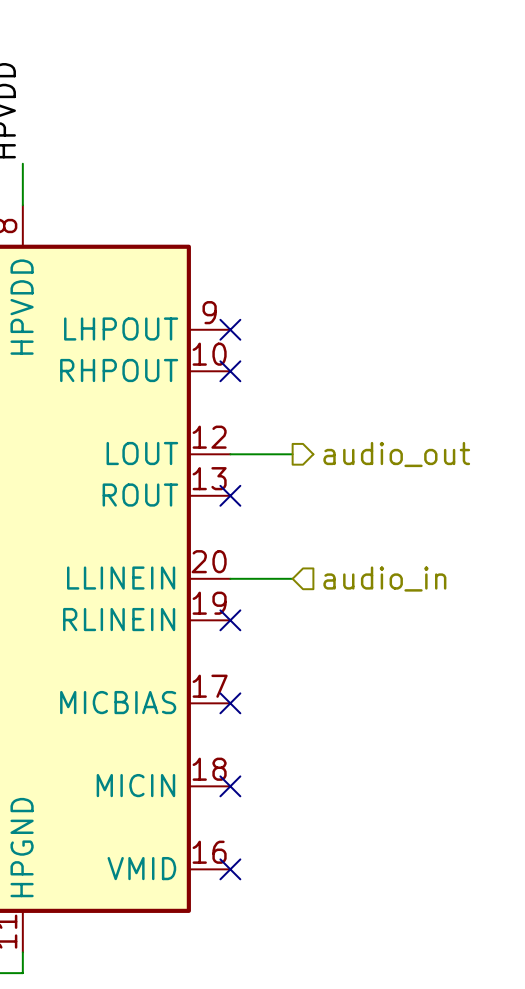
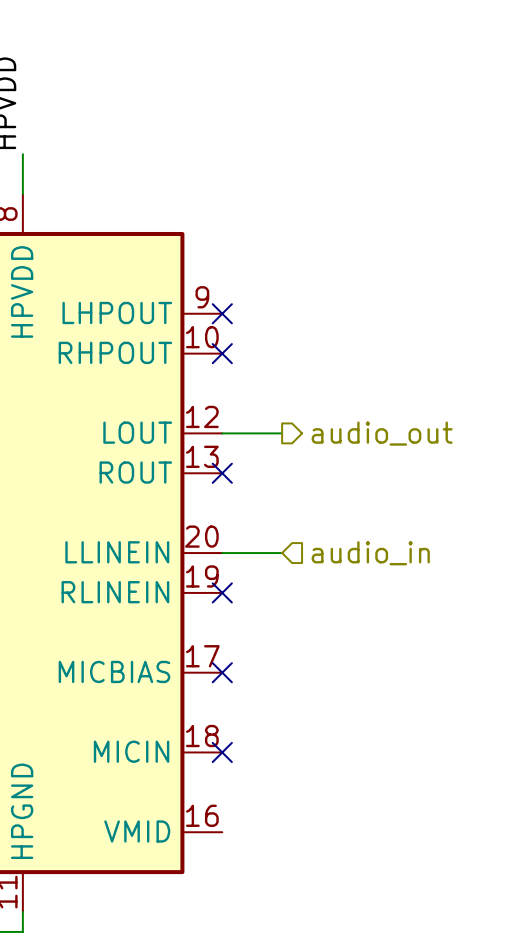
no-connect mark: (230, 869) -> none

